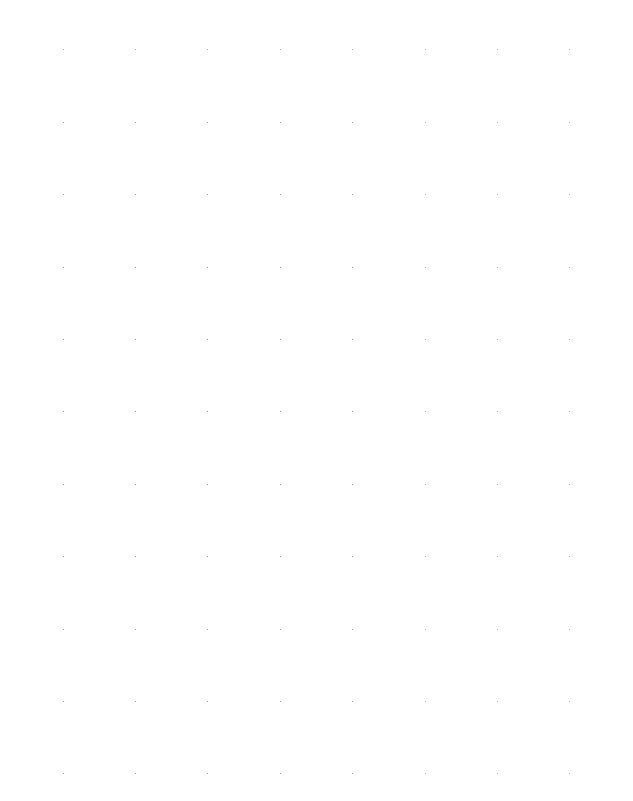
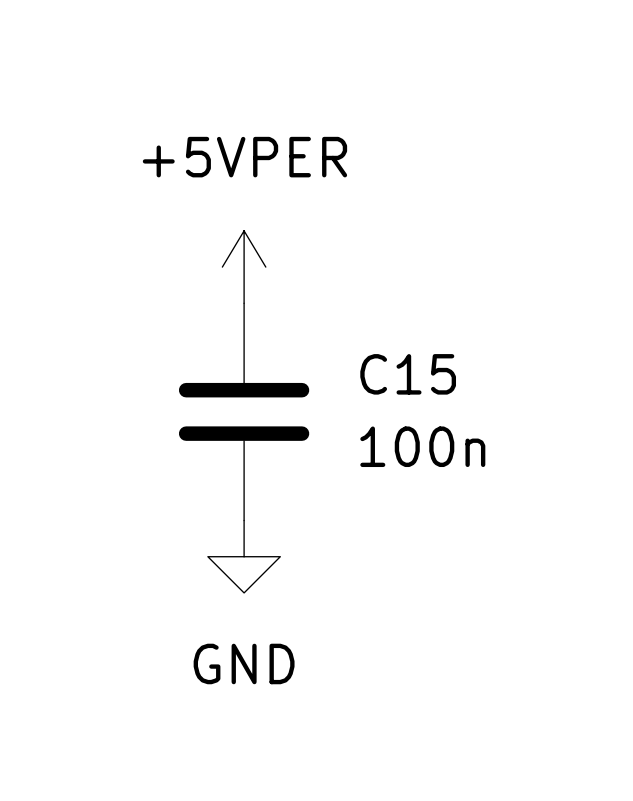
power symbol: none -> +5VPER (244, 267)
C15: none -> 100n (244, 411)
power symbol: none -> GND (244, 556)

